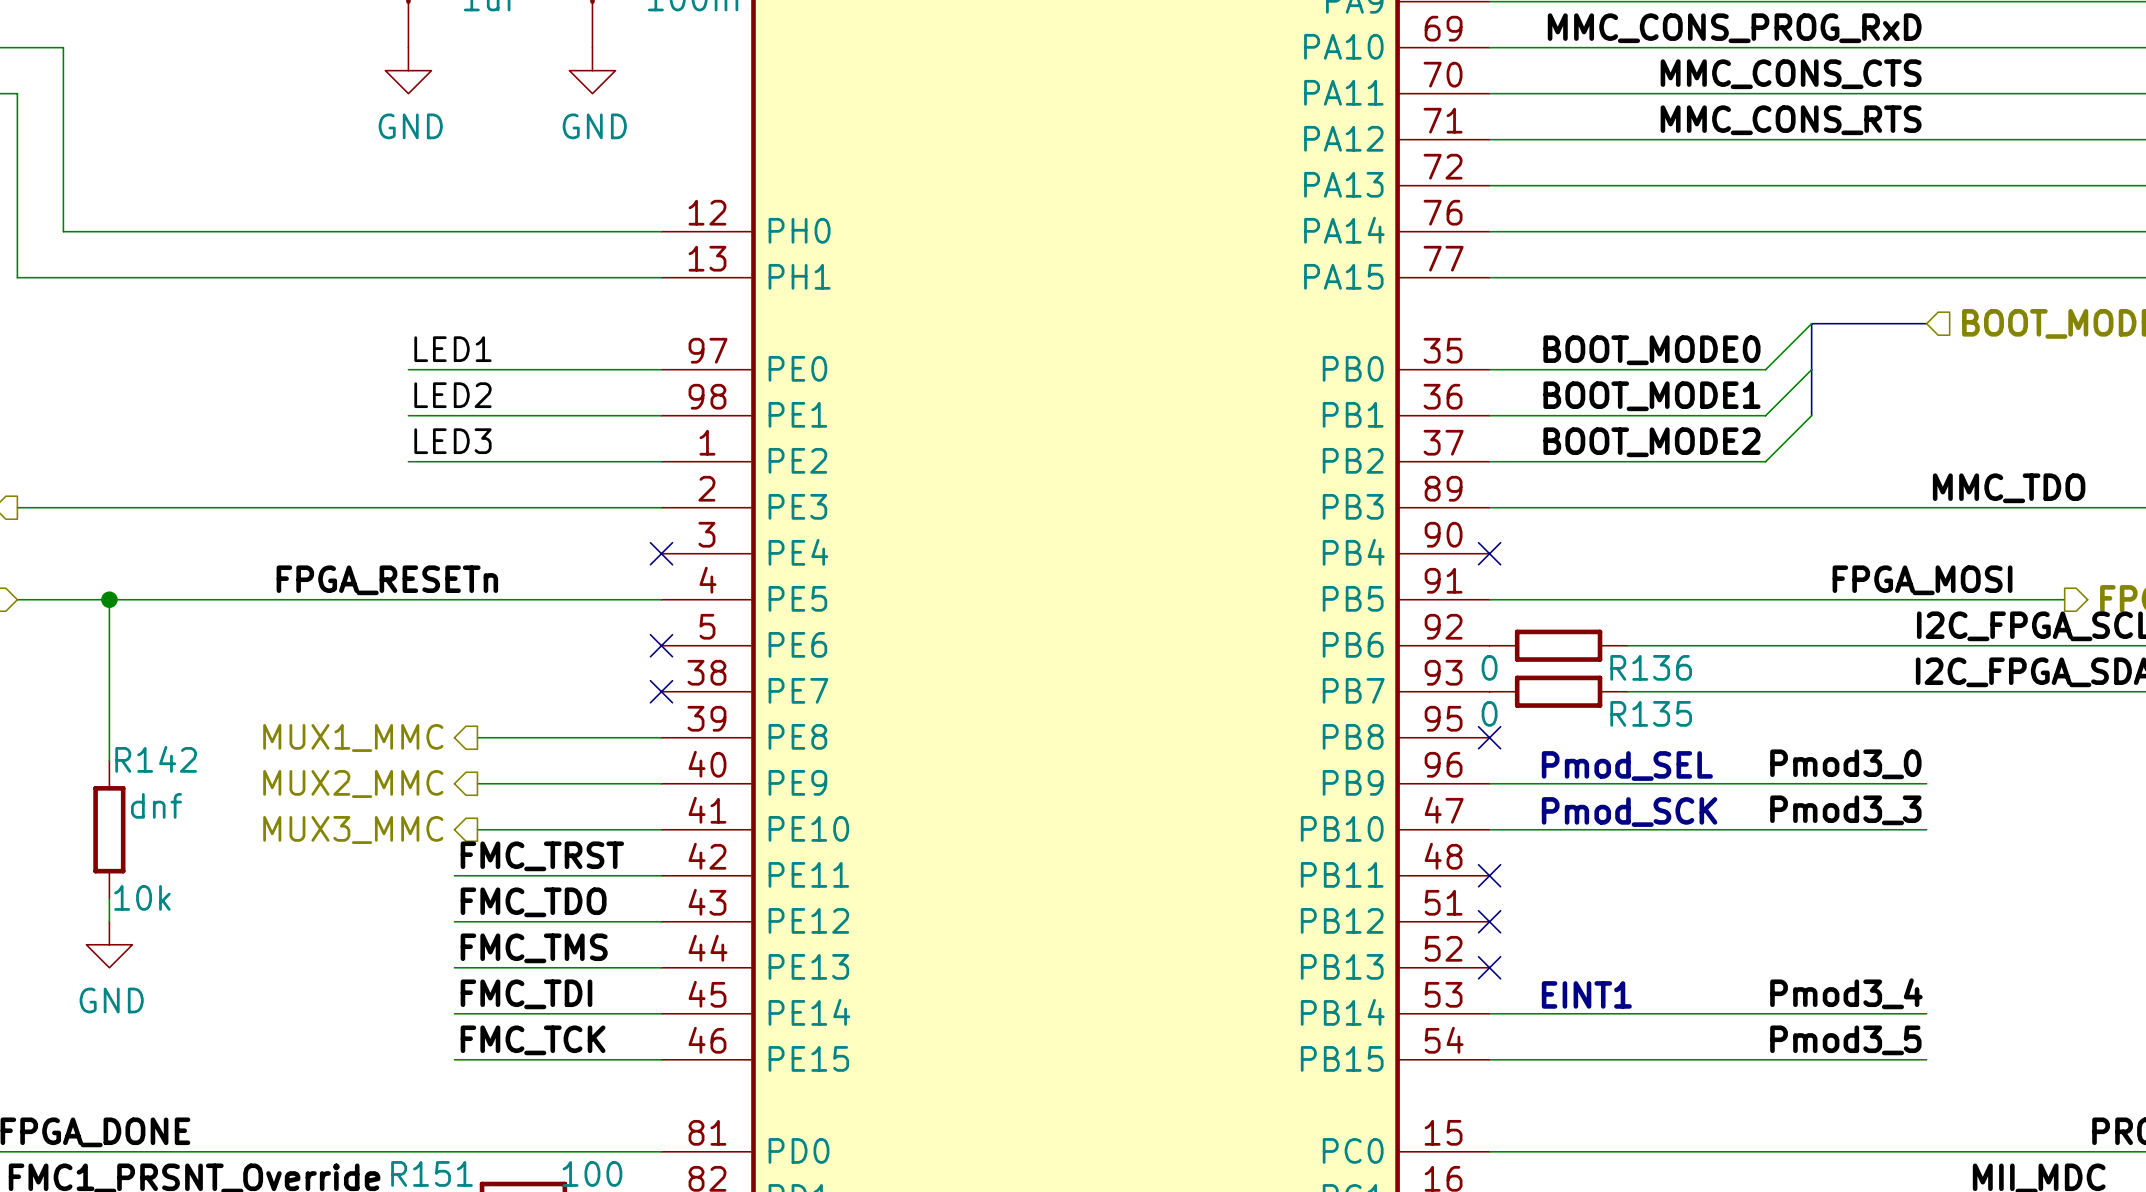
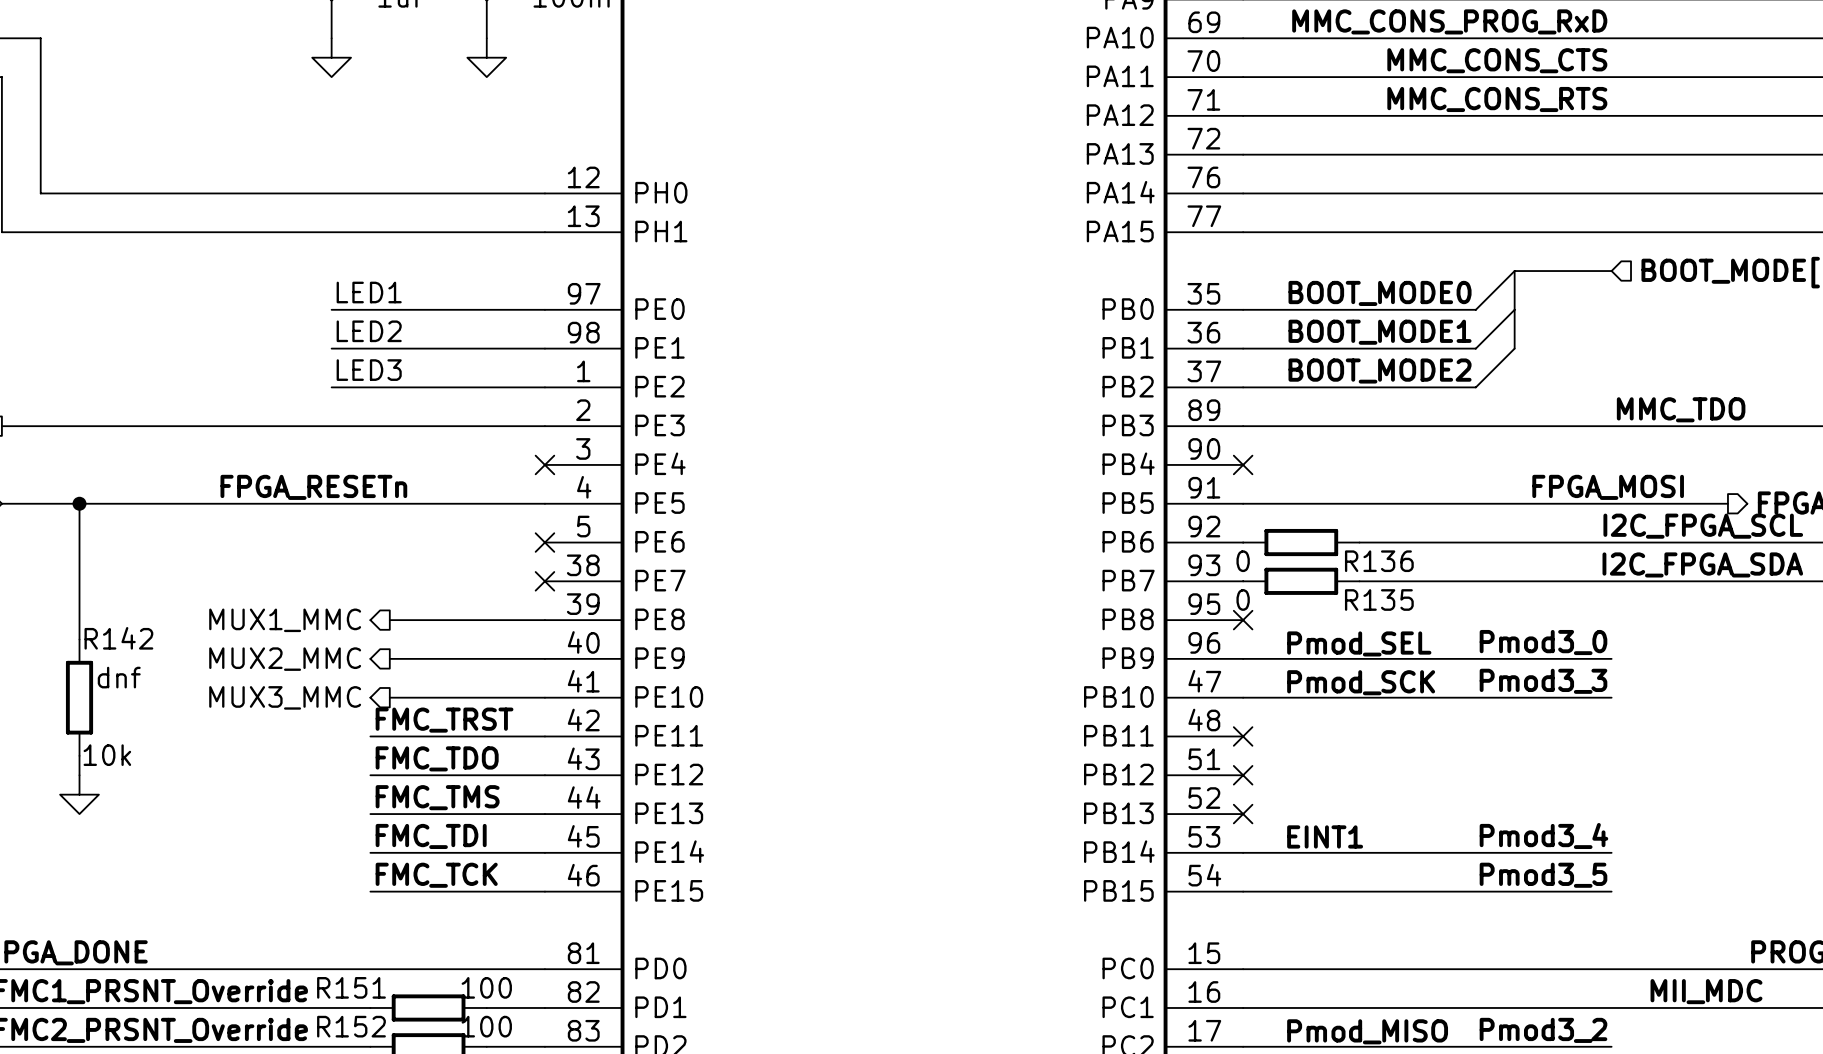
power symbol text: GND (410, 126) -> none
power symbol text: GND (594, 126) -> none
power symbol text: GND (111, 1000) -> none

